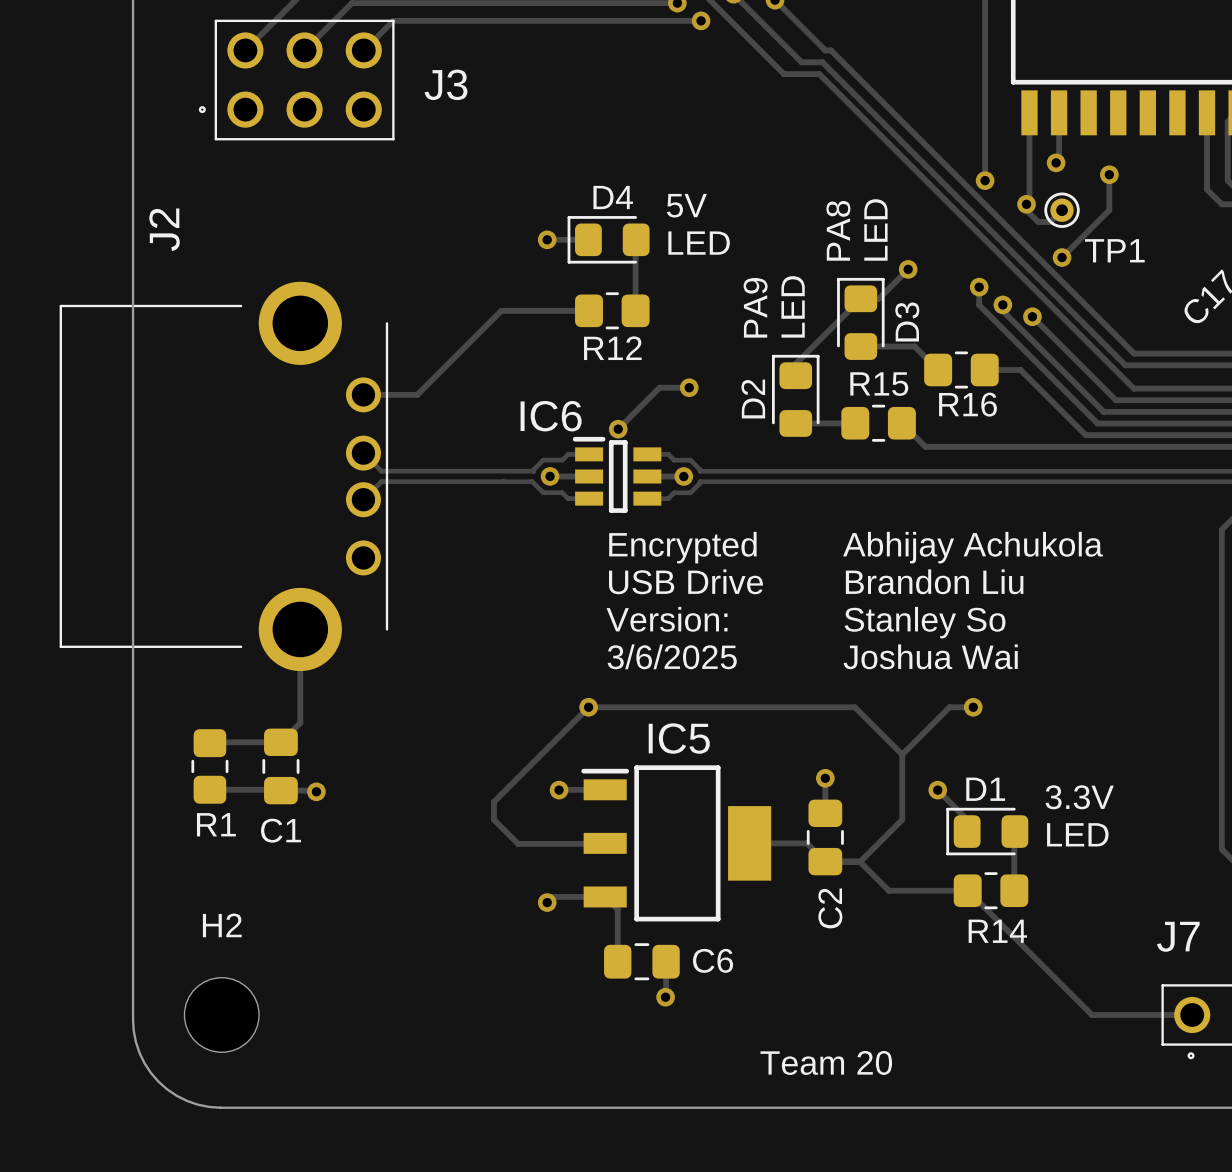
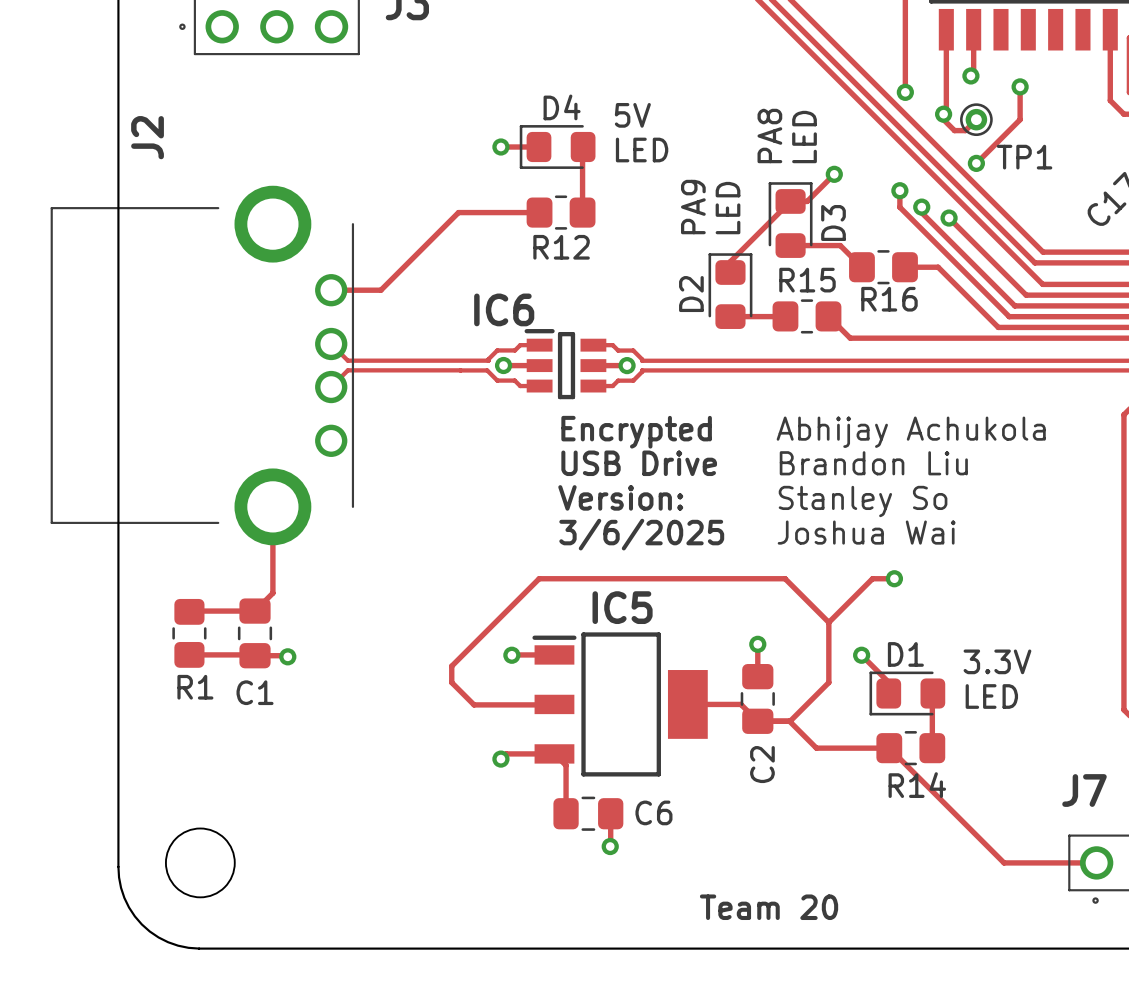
track: (689, 387) (659, 387) (618, 429) -> none
via: (689, 387) -> none
via: (618, 429) -> none
via: (588, 707) -> none
H2 name: H2 (222, 925) -> none

